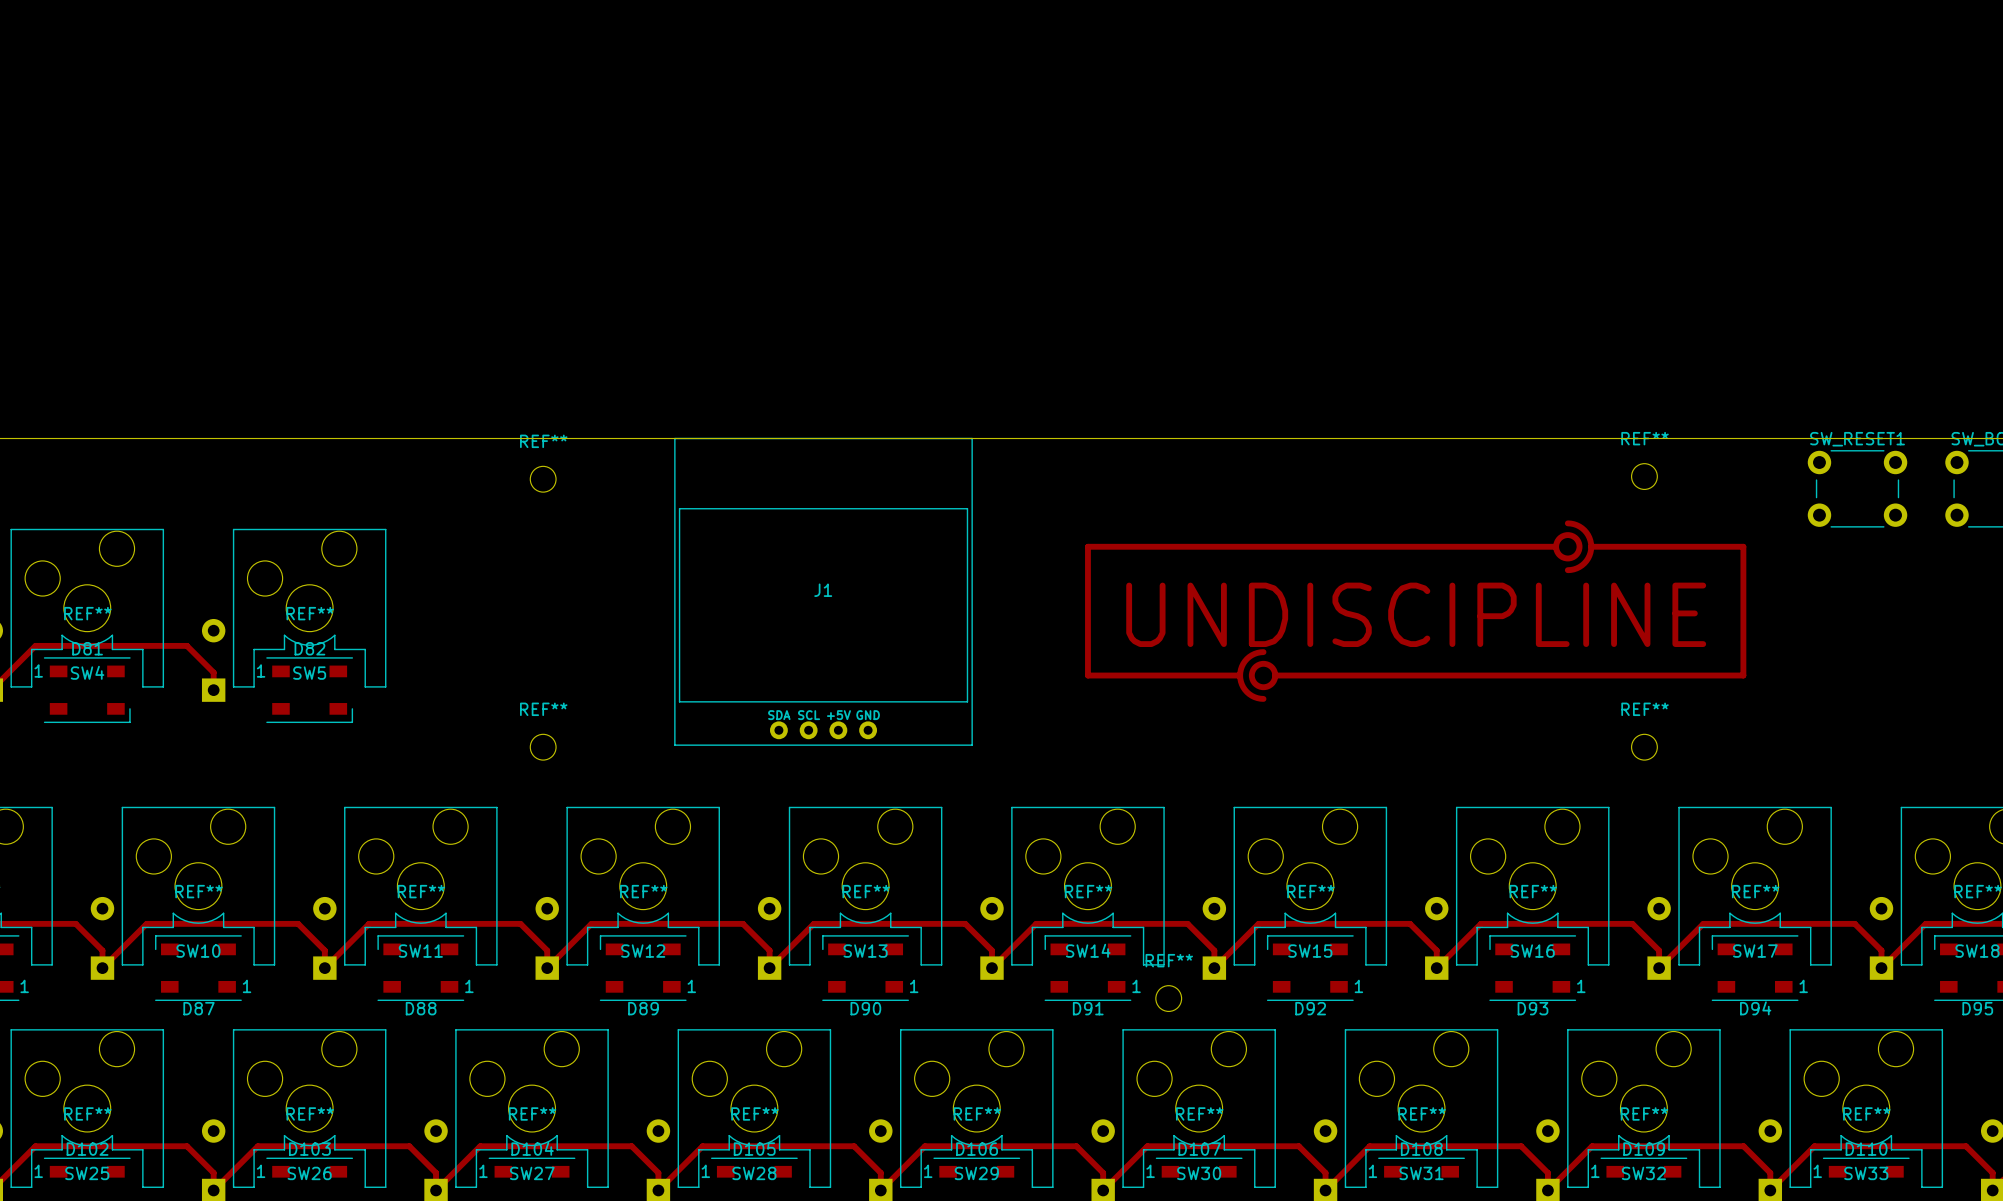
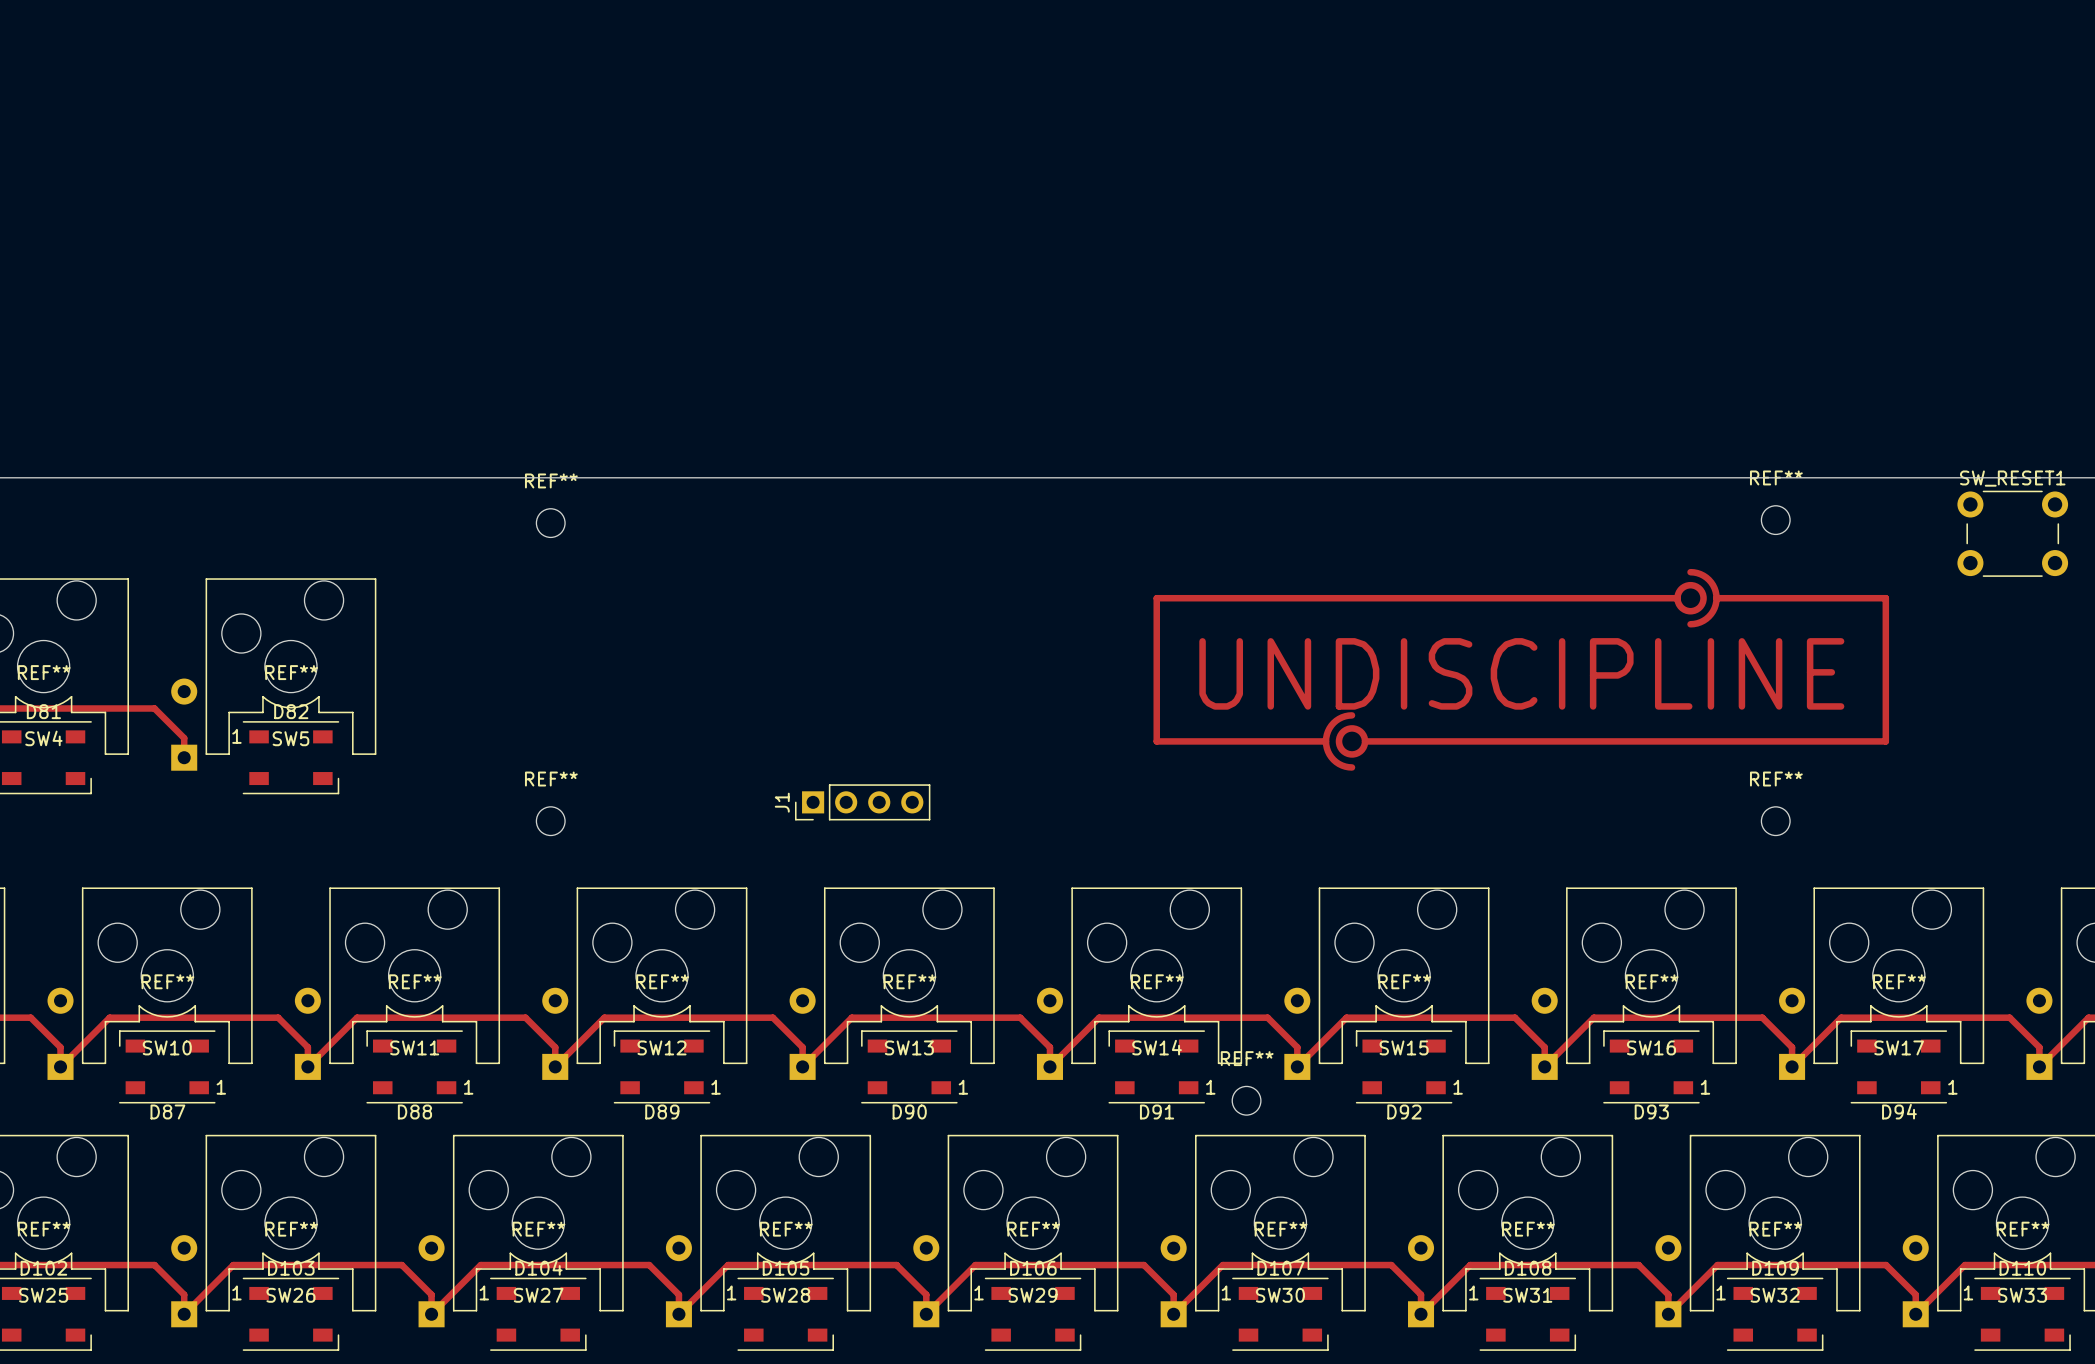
J1 footprint: [674, 437, 973, 746] -> [795, 784, 931, 821]
J1 name position: J1 (823, 590) -> J1 (782, 802)

